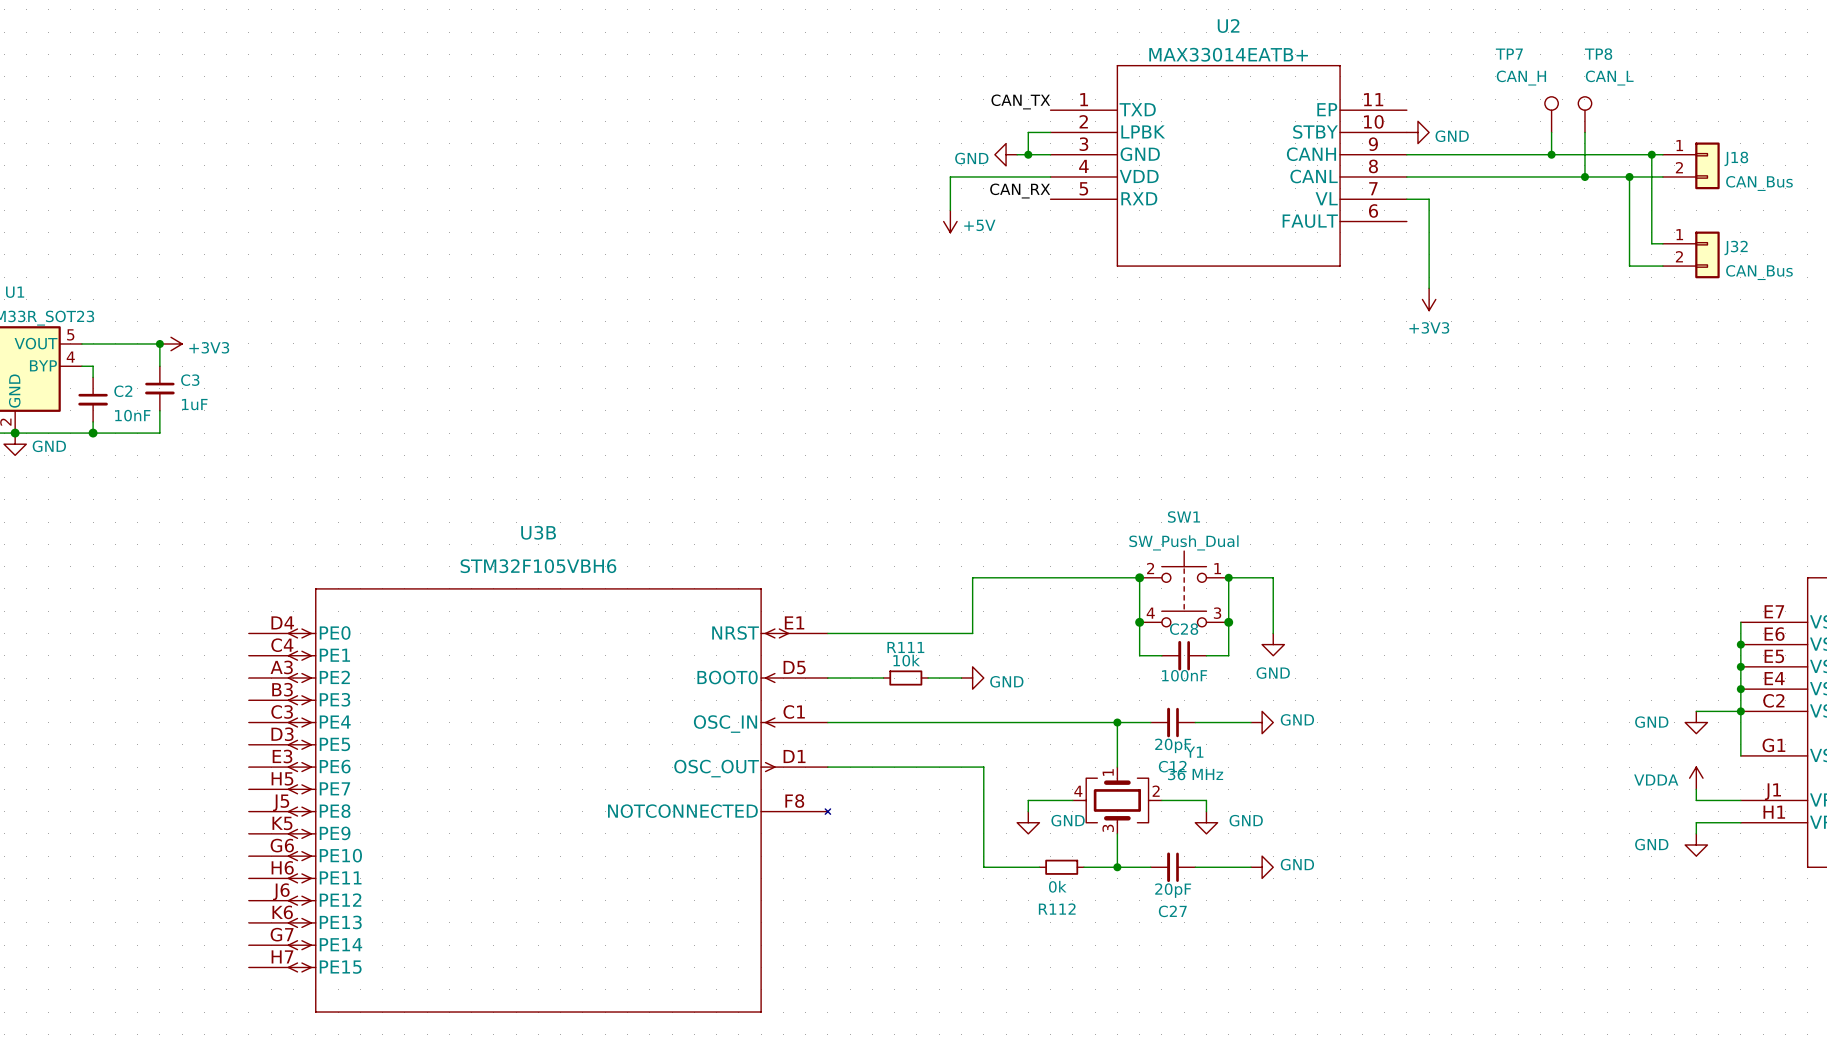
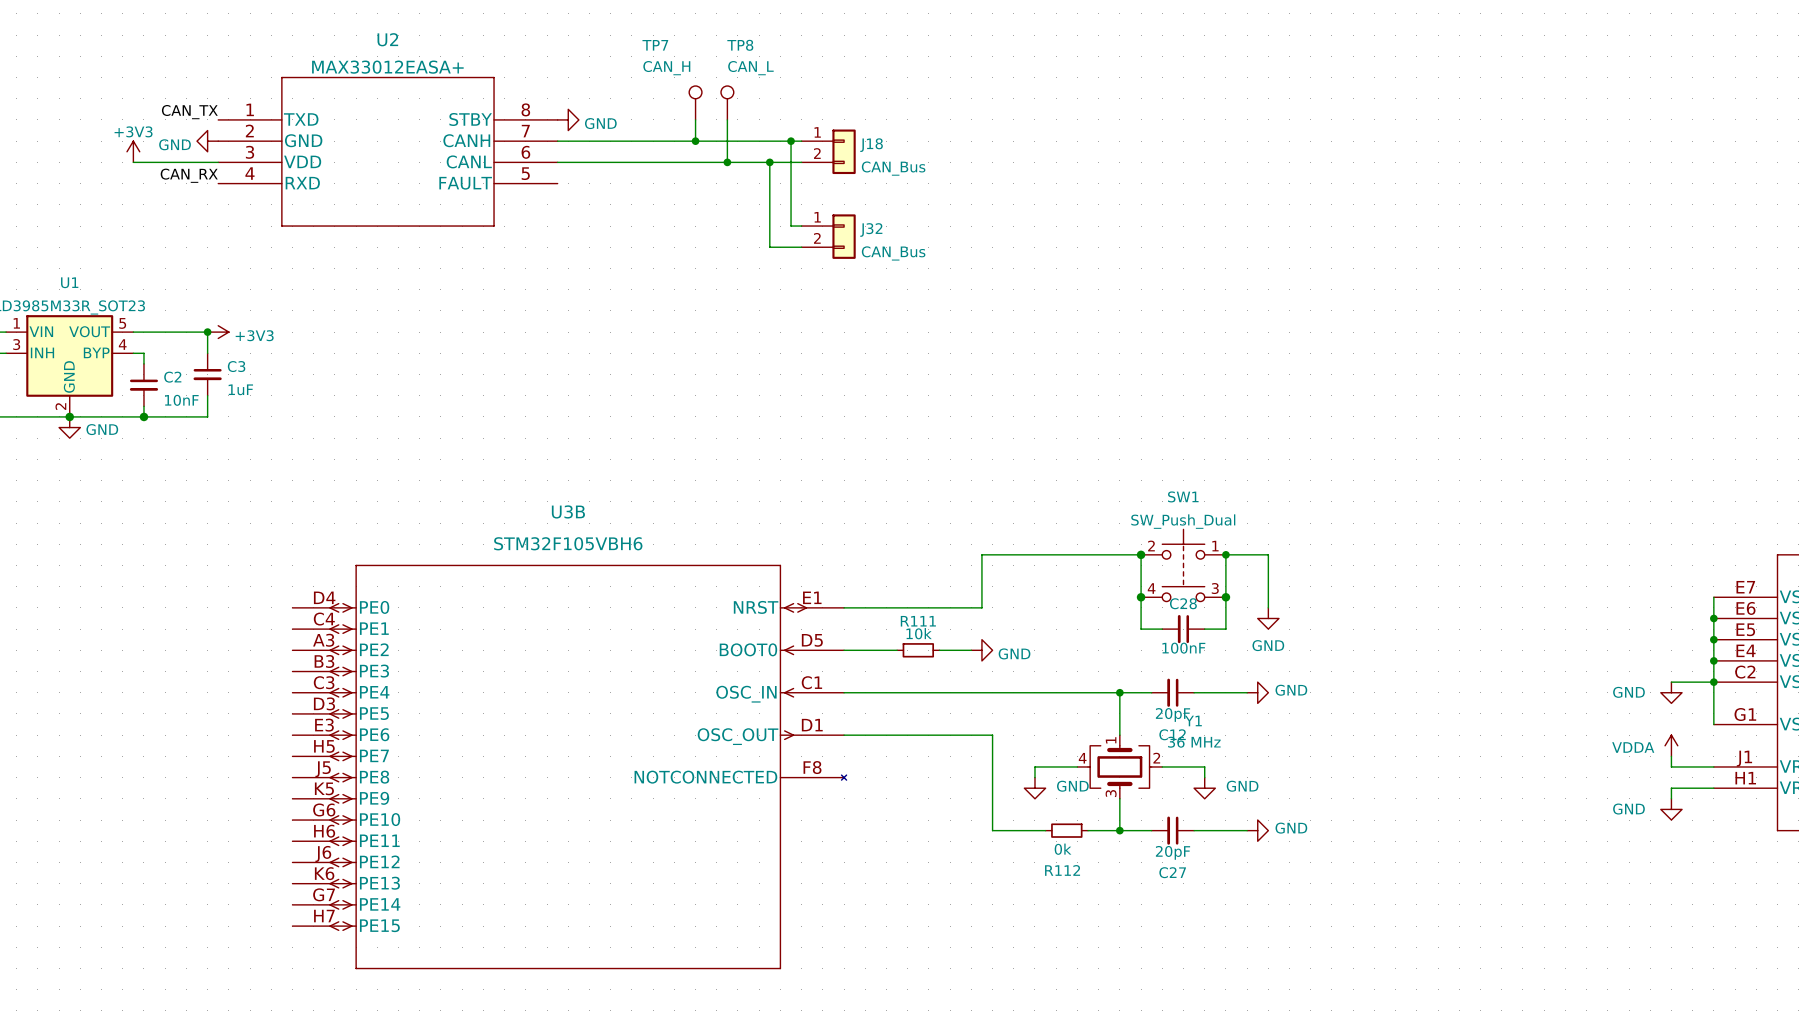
U2 name position: U2 (1228, 26) -> U2 (387, 39)
U2 value: MAX33014EATB+ (1228, 54) -> MAX33012EASA+ (387, 67)
U2 symbol: [1050, 65, 1407, 267] -> [218, 76, 558, 227]
label: CAN_TX (1020, 101) -> none
label: none -> CAN_TX (189, 112)
TP7 position: (1551, 114) -> (695, 102)
TP8 position: (1584, 114) -> (727, 102)
power symbol: none -> GND (568, 119)
wire: none -> (695, 119) (695, 141)
wire: none -> (727, 119) (727, 162)
wire: (1050, 132) (1028, 132) (1028, 154) -> none
power symbol: GND (1417, 132) -> none
wire: (1551, 132) (1551, 154) -> none
wire: (1584, 132) (1584, 176) -> none
power symbol: none -> GND (207, 141)
wire: none -> (557, 141) (801, 141)
junction: none -> (695, 141)
wire: none -> (791, 141) (791, 226) (801, 226)
junction: none -> (791, 141)
power symbol: none -> +3V3 (133, 151)
power symbol: GND (1006, 154) -> none
wire: (1017, 154) (1050, 154) -> none
junction: (1028, 154) -> none
wire: (1406, 154) (1662, 154) -> none
junction: (1551, 154) -> none
wire: (1651, 154) (1651, 243) (1662, 243) -> none
junction: (1651, 154) -> none
wire: none -> (133, 162) (218, 162)
wire: none -> (557, 162) (801, 162)
junction: none -> (727, 162)
wire: none -> (769, 162) (769, 247) (801, 247)
junction: none -> (769, 162)
J18 position: (1691, 165) -> (828, 151)
wire: (1050, 176) (950, 176) (950, 210) -> none
wire: (1406, 176) (1662, 176) -> none
junction: (1584, 176) -> none
wire: (1629, 176) (1629, 266) (1662, 266) -> none
junction: (1629, 176) -> none
label: none -> CAN_RX (189, 175)
label: CAN_RX (1020, 191) -> none
wire: (1406, 199) (1429, 199) (1429, 288) -> none
power symbol: +5V (950, 221) -> none
J32 position: (1691, 254) -> (828, 236)
power symbol: +3V3 (1429, 299) -> none

